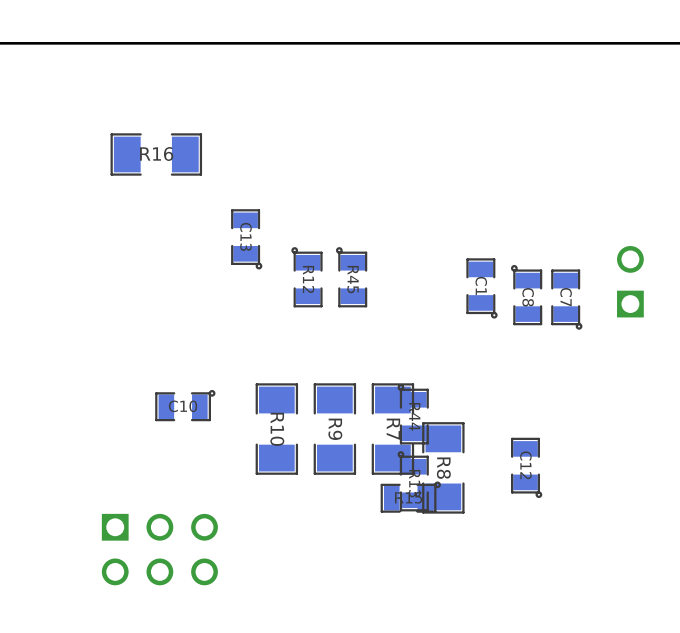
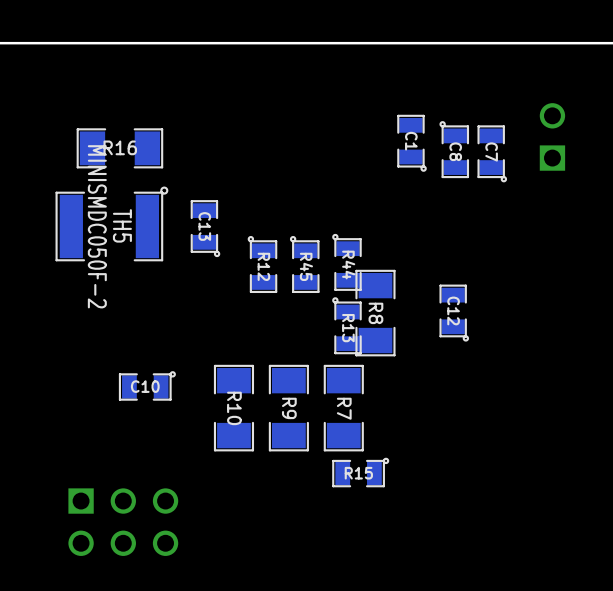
TH5: none -> MINISMDC050F-2 (111, 223)
part position: (630, 281) -> (552, 136)
C1 position: (481, 288) -> (412, 143)
C8 position: (526, 295) -> (454, 149)
C7 position: (566, 299) -> (492, 153)
R44 position: (413, 414) -> (346, 262)
R8 position: (443, 467) -> (375, 313)
C12 position: (526, 467) -> (454, 313)
R13 position: (413, 481) -> (346, 325)

